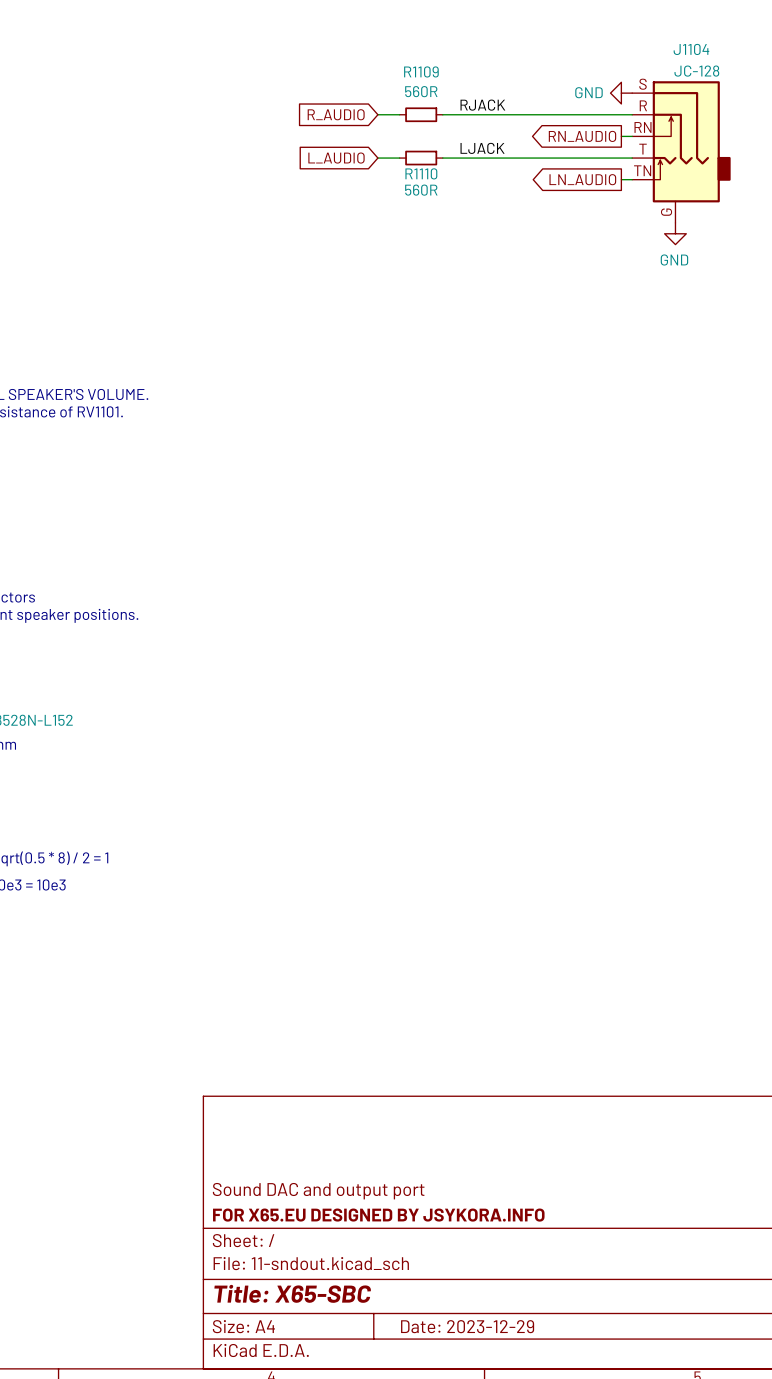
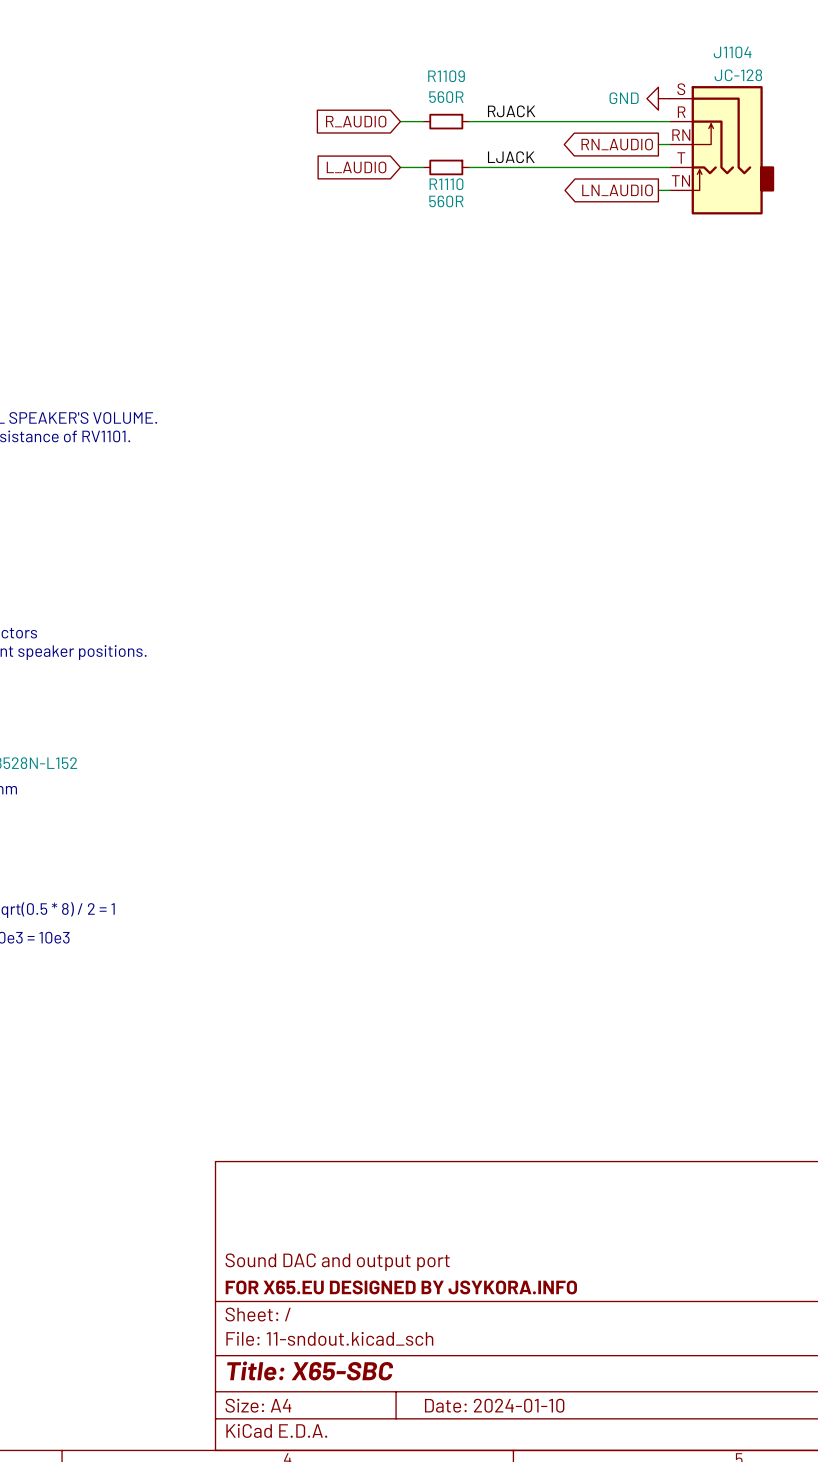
J1104 symbol: [632, 81, 731, 223] -> [669, 86, 775, 215]
power symbol: GND (675, 233) -> none
title block: Date: 2023-12-29 (467, 1326) -> Date: 2024-01-10 (494, 1405)

